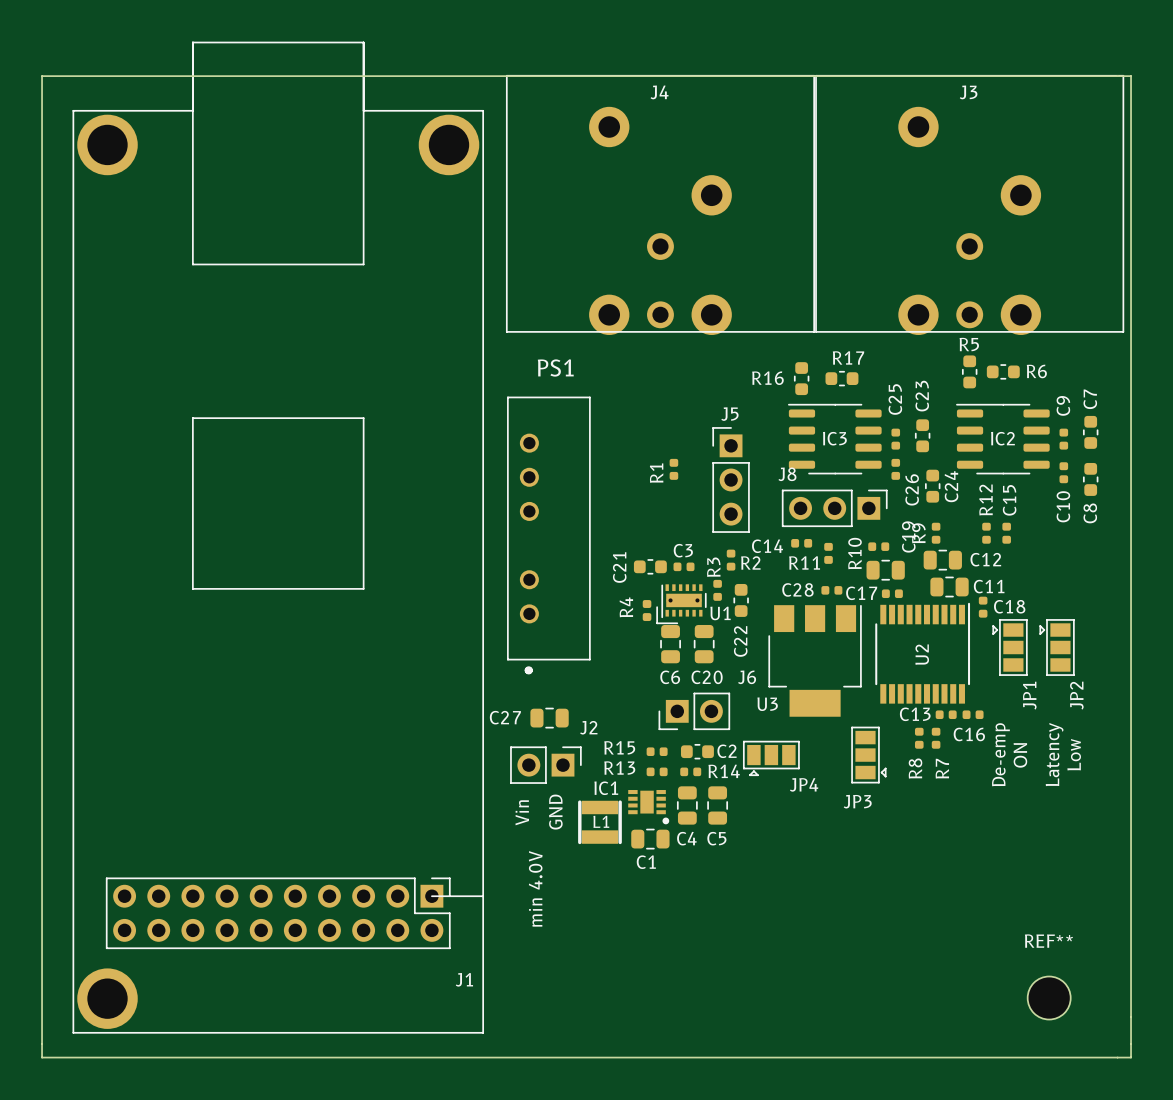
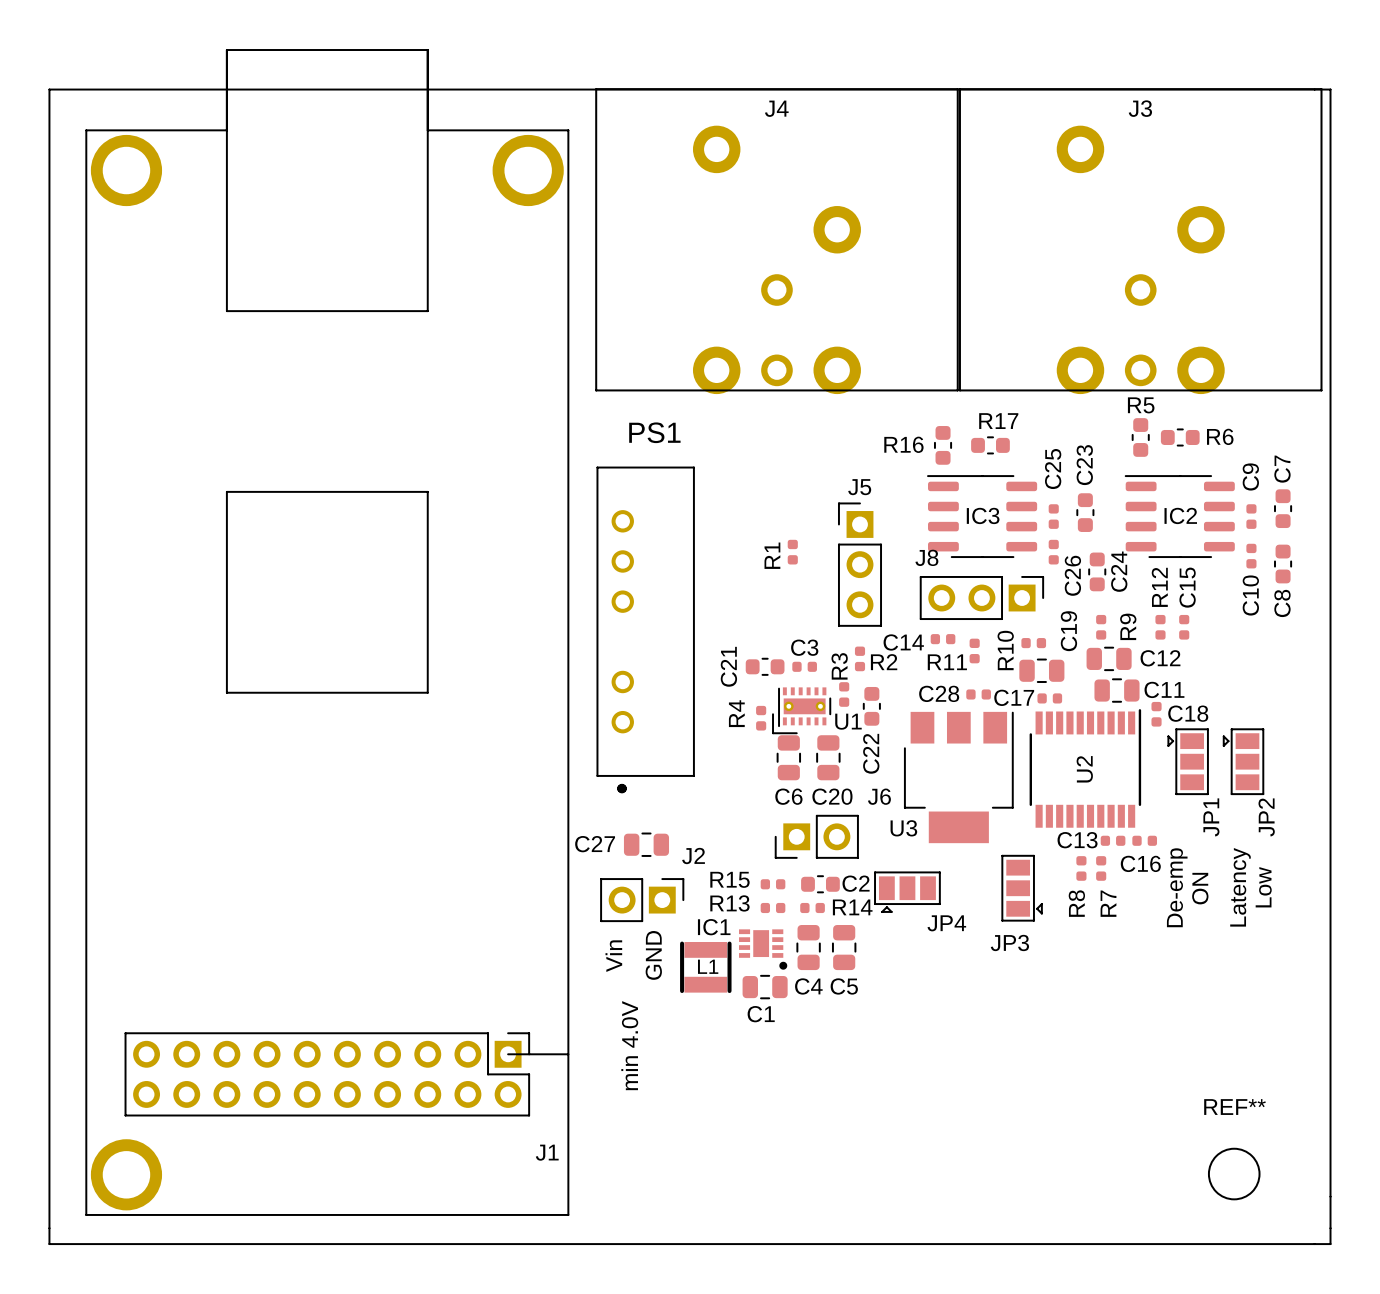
R9 name position: R9 (918, 533) -> R9 (1128, 626)

